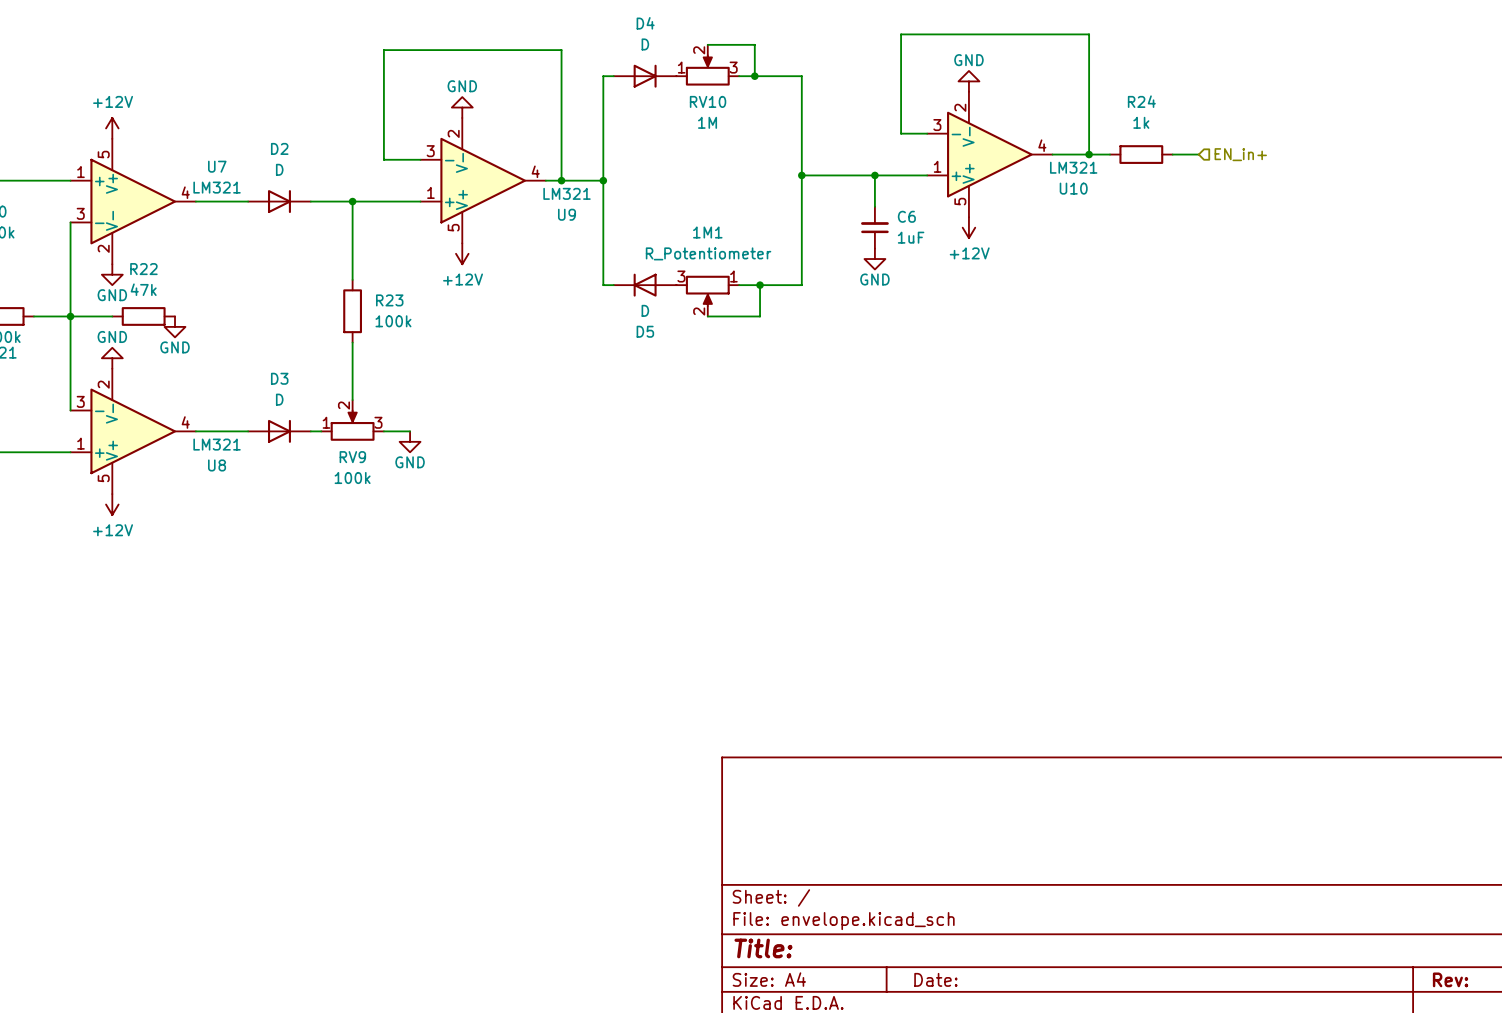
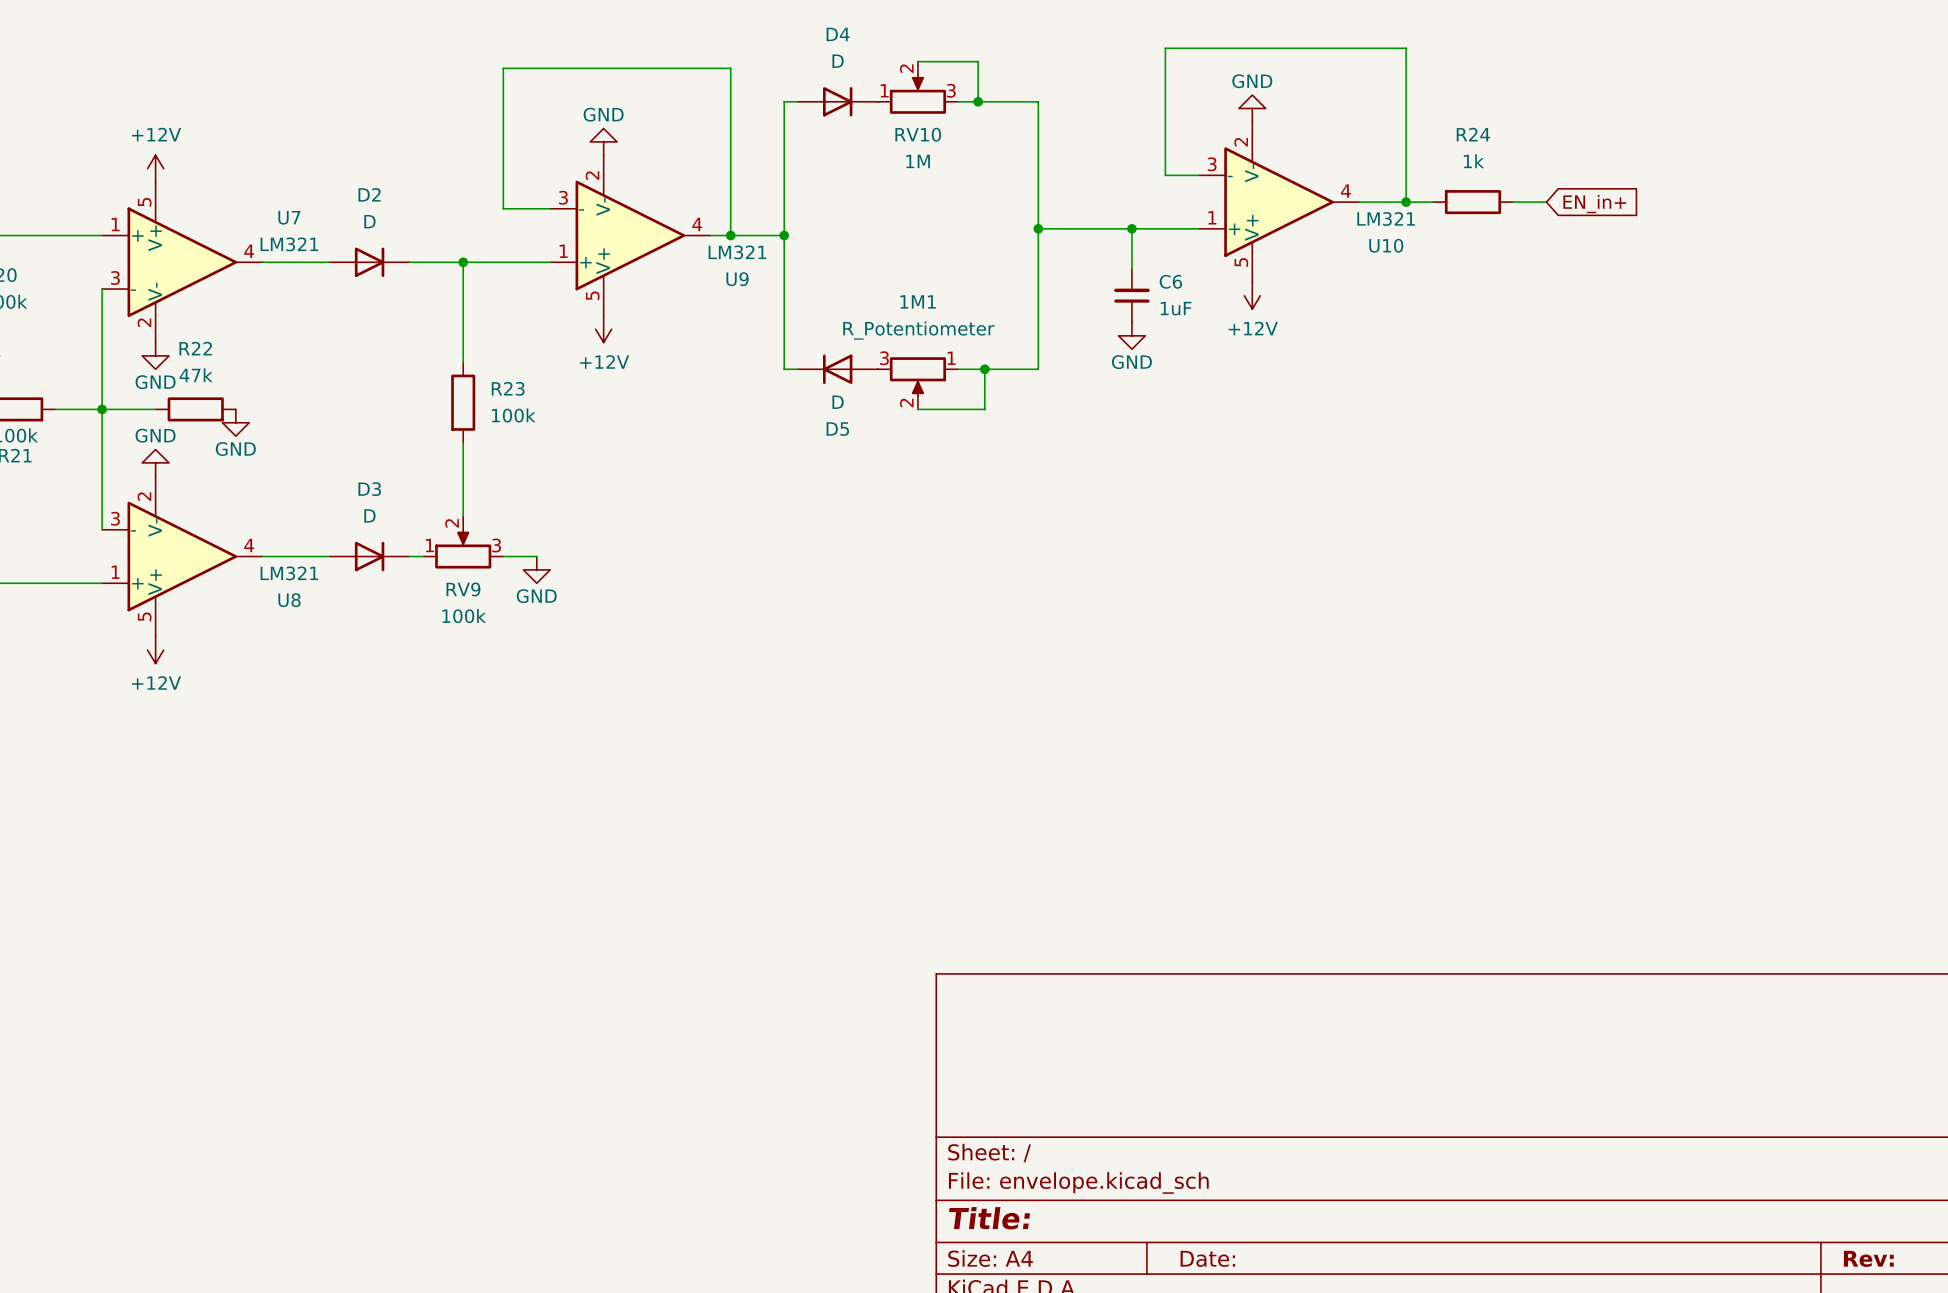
hierarchical label: EN_in+ (1240, 154) -> none
global label: none -> EN_in+ (1594, 203)

